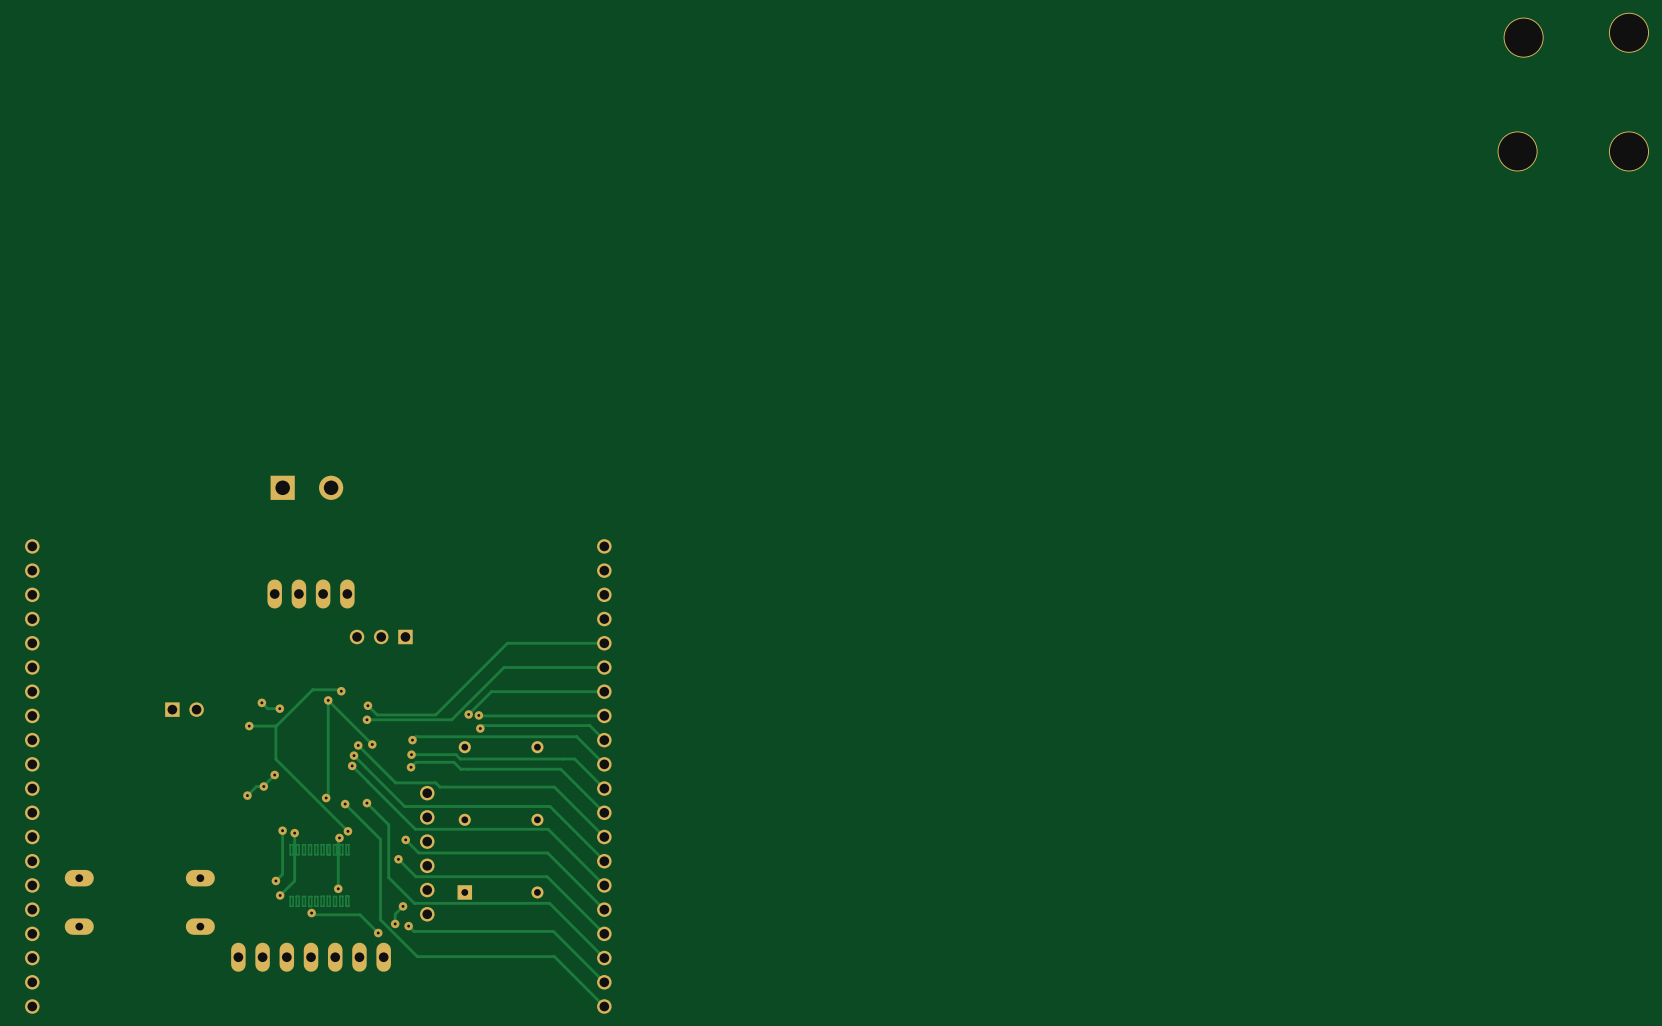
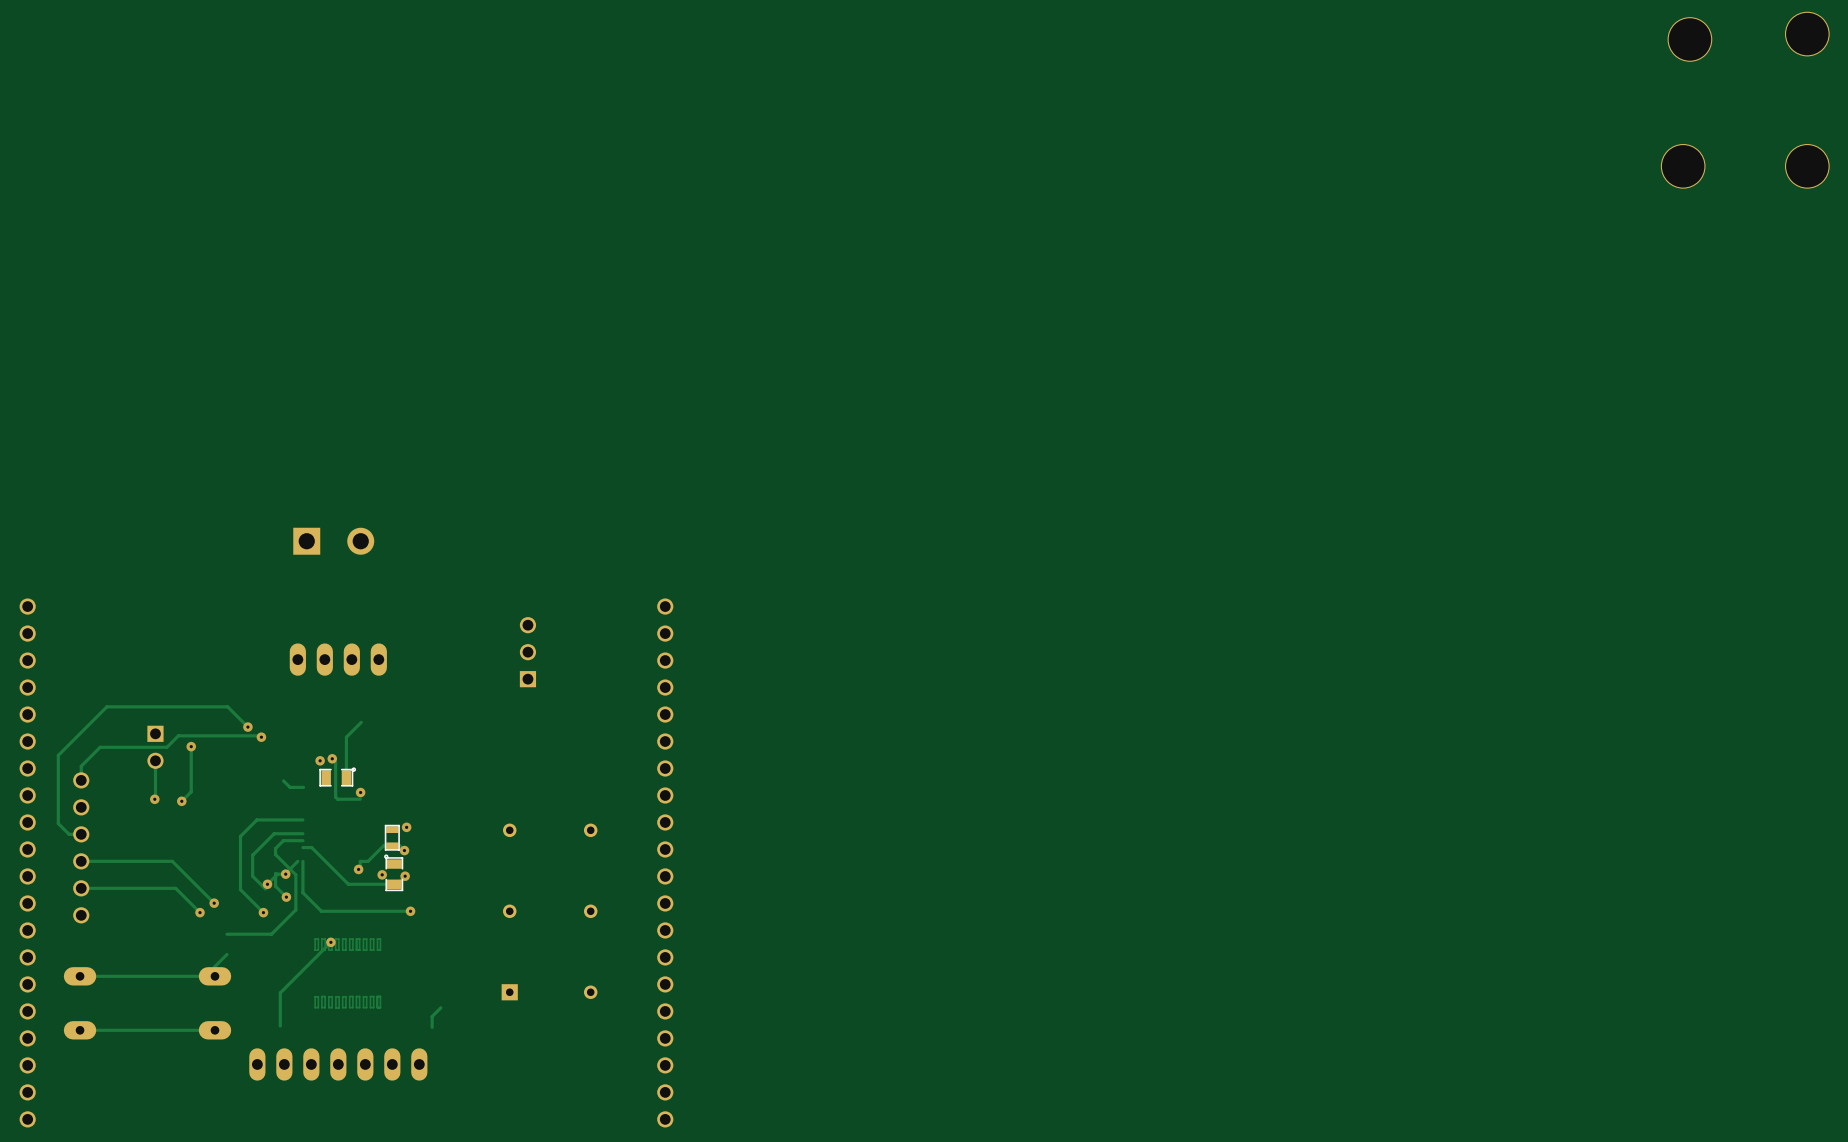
part rotation: 0° (381, 636) -> 90° clockwise (527, 652)
part position: (381, 636) -> (527, 652)
track: (604, 643) (507, 643) (435, 714) (377, 714) (367, 705) -> none
track: none -> (361, 722) (346, 737) (346, 777)
track: none -> (247, 727) (227, 706) (106, 706) (58, 755) (58, 823) (69, 834) (81, 834)
via: none -> (247, 727)
track: none -> (261, 737) (178, 735) (166, 747) (100, 747) (81, 766) (81, 780)
via: none -> (261, 737)
track: (604, 667) (504, 667) (451, 719) (366, 719) -> none
track: none -> (191, 746) (191, 791) (181, 801)
via: none -> (191, 746)
track: none -> (332, 758) (335, 762) (335, 797) (337, 799) (360, 799)
via: none -> (332, 758)
track: none -> (155, 760) (154, 799)
via: none -> (320, 760)
track: (341, 691) (312, 689) (276, 726) (249, 726) -> none
via: (341, 691) -> none
track: (604, 691) (491, 691) (468, 714) -> none
part: none -> (337, 777)
via: (328, 700) -> none
via: (261, 702) -> none
via: (367, 705) -> none
via: (279, 708) -> none
part rotation: 0° (184, 709) -> 90° clockwise (155, 747)
part position: (184, 709) -> (155, 747)
via: none -> (360, 792)
via: (468, 714) -> none
track: (478, 715) (604, 715) -> none
via: (478, 715) -> none
via: none -> (154, 799)
via: (366, 719) -> none
via: none -> (181, 801)
via: (249, 726) -> none
track: (275, 726) (275, 759) (347, 831) -> none
track: (480, 728) (483, 725) (589, 725) (604, 740) -> none
via: (480, 728) -> none
track: none -> (302, 819) (256, 819) (240, 836) (240, 889) (263, 912)
track: (412, 740) (415, 736) (576, 736) (604, 764) -> none
via: (412, 740) -> none
track: (372, 744) (328, 700) (328, 795) (326, 798) -> none
track: (358, 745) (395, 782) (435, 782) (439, 787) (554, 787) (604, 837) -> none
via: (358, 745) -> none
track: none -> (302, 833) (274, 833) (252, 855) (252, 876) (265, 889)
part: none -> (392, 837)
track: (411, 754) (455, 754) (460, 759) (574, 759) (604, 788) -> none
via: (411, 754) -> none
track: (354, 755) (365, 767) -> none
via: (354, 755) -> none
track: none -> (302, 840) (283, 840) (275, 848) (275, 854) (295, 874) (295, 909) (271, 934) (227, 934)
part: none -> (81, 847)
track: none -> (302, 847) (311, 847) (348, 884) (397, 884) (405, 876)
track: (352, 765) (367, 781) -> none
via: (352, 765) -> none
track: none -> (404, 850) (399, 845) (383, 845) (367, 861) (360, 861) (358, 869)
via: none -> (404, 850)
track: (365, 767) (404, 806) (550, 806) (604, 861) -> none
track: (411, 767) (416, 762) (453, 762) (460, 769) (560, 769) (604, 812) -> none
via: (411, 767) -> none
track: none -> (81, 861) (172, 861) (214, 903)
via: (274, 775) -> none
track: none -> (302, 861) (302, 892) (321, 911) (410, 911)
track: (367, 781) (415, 829) (548, 829) (604, 885) -> none
via: none -> (358, 869)
track: none -> (275, 873) (275, 886) (286, 897)
part: none -> (393, 872)
via: none -> (382, 874)
via: none -> (405, 876)
via: (326, 798) -> none
track: none -> (81, 888) (175, 888) (200, 912)
track: (366, 803) (388, 824) (388, 877) (414, 903) (549, 903) (604, 958) -> none
via: (366, 803) -> none
track: (345, 804) (380, 839) (380, 919) (417, 956) (554, 956) (604, 1006) -> none
via: (345, 804) -> none
via: none -> (286, 897)
via: none -> (214, 903)
via: none -> (410, 911)
via: none -> (200, 912)
via: none -> (263, 912)
track: (282, 830) (282, 874) (275, 880) -> none
via: (282, 830) -> none
via: (347, 831) -> none
track: (294, 833) (294, 880) (280, 895) -> none
via: (294, 833) -> none
track: (339, 837) (338, 888) -> none
via: (339, 837) -> none
track: (405, 839) (418, 852) (547, 852) (604, 909) -> none
via: (405, 839) -> none
track: none -> (330, 942) (280, 992) (280, 1026)
via: none -> (330, 942)
part: (427, 853) -> none
track: none -> (227, 954) (214, 966) (214, 976) (80, 976)
track: (398, 859) (415, 876) (547, 876) (604, 933) -> none
via: (398, 859) -> none
via: (275, 880) -> none
via: (338, 888) -> none
via: (280, 895) -> none
via: (403, 906) -> none
track: (311, 913) (313, 914) (360, 914) (378, 933) -> none
via: (311, 913) -> none
via: (395, 923) -> none
track: none -> (214, 1030) (80, 1030)
track: (408, 926) (413, 931) (553, 931) (604, 982) -> none
via: (408, 926) -> none
via: (378, 933) -> none

